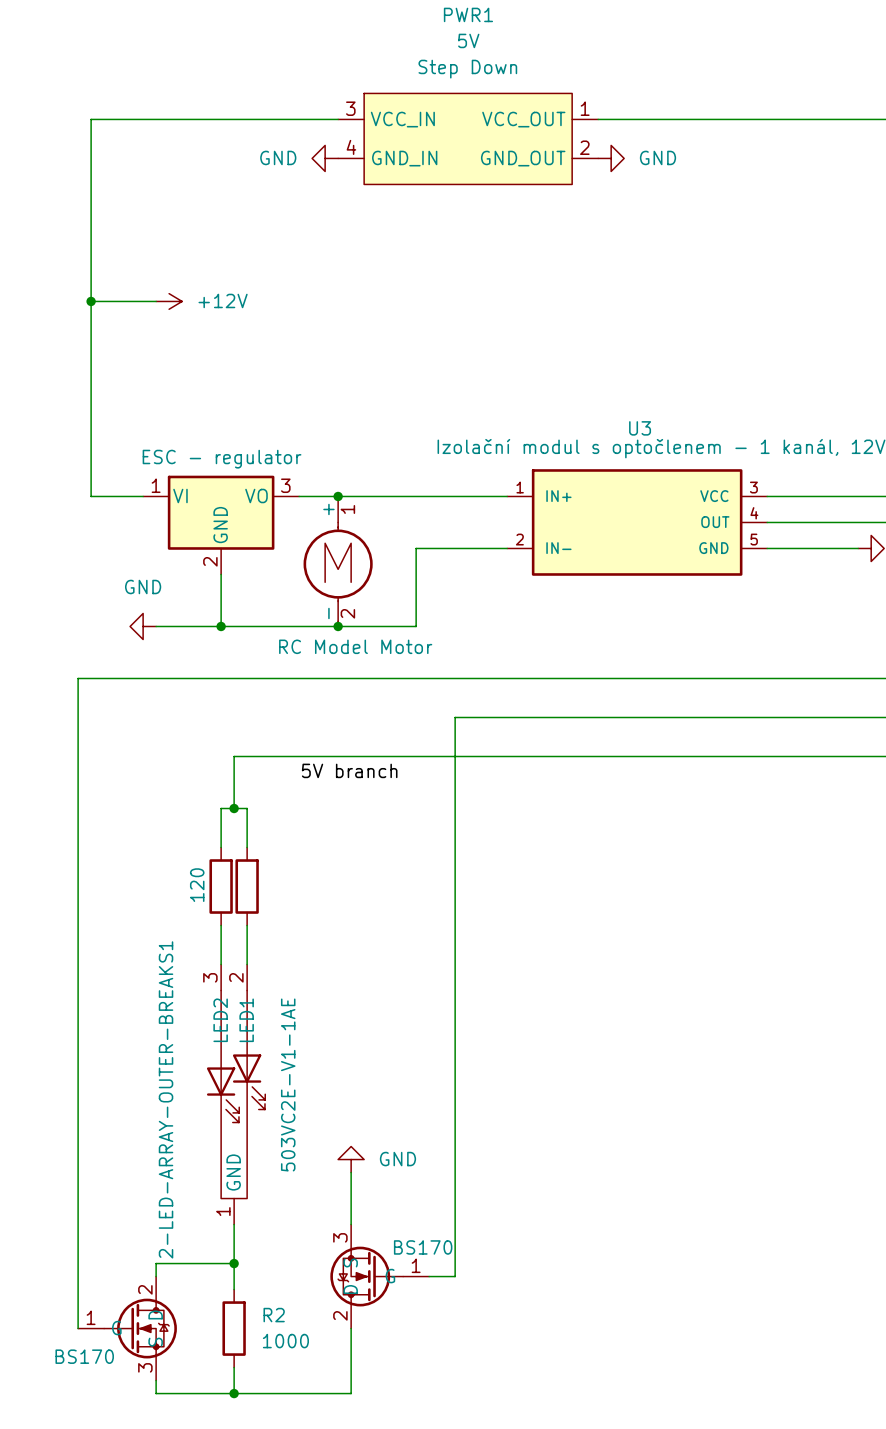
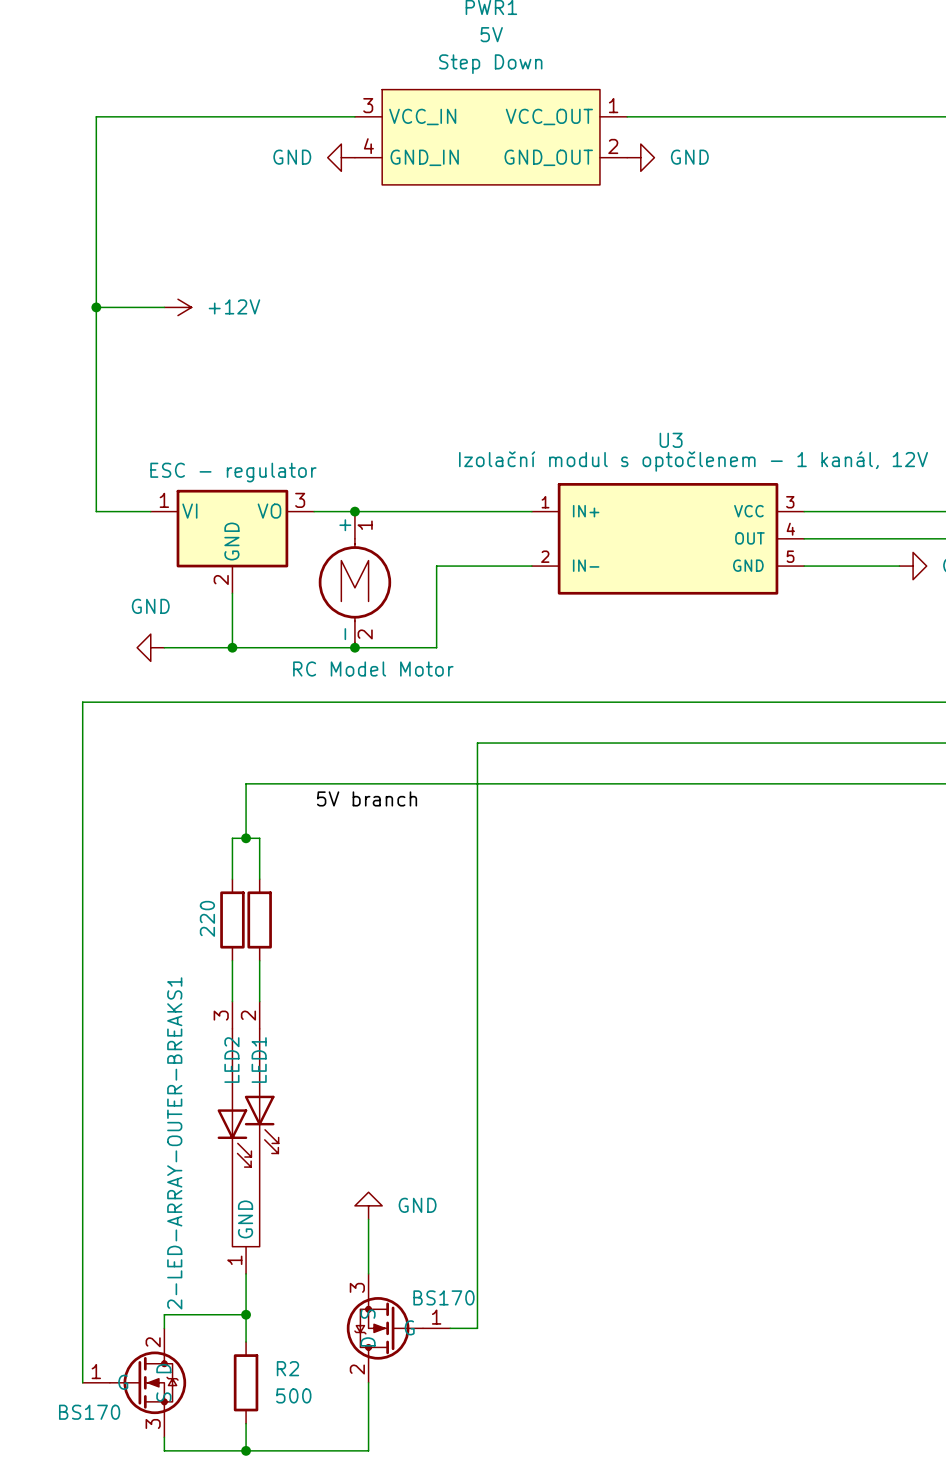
part value: 120 (197, 885) -> 220 (207, 918)
2-LED-ARRAY-OUTER-BREAKS1 value: 503VC2E-V1-1AE (288, 1084) -> none
R2 value: 1000 (285, 1341) -> 500 (293, 1395)

